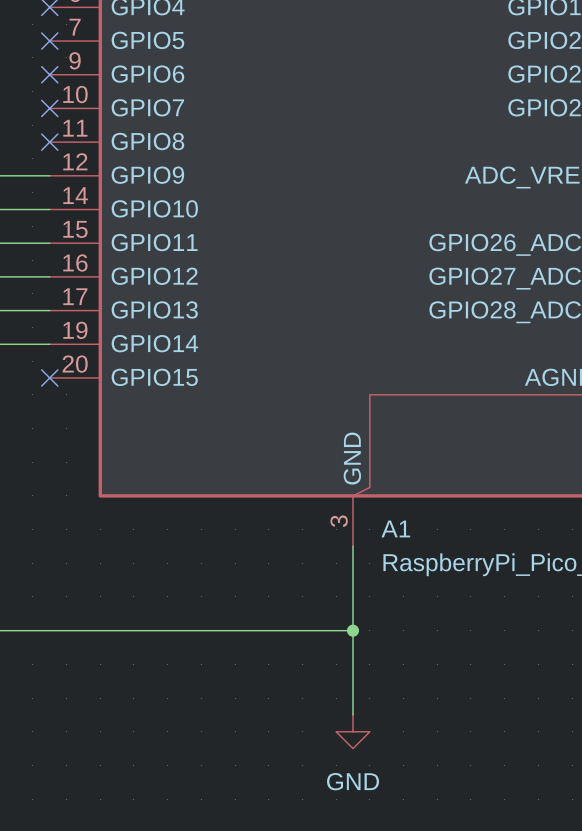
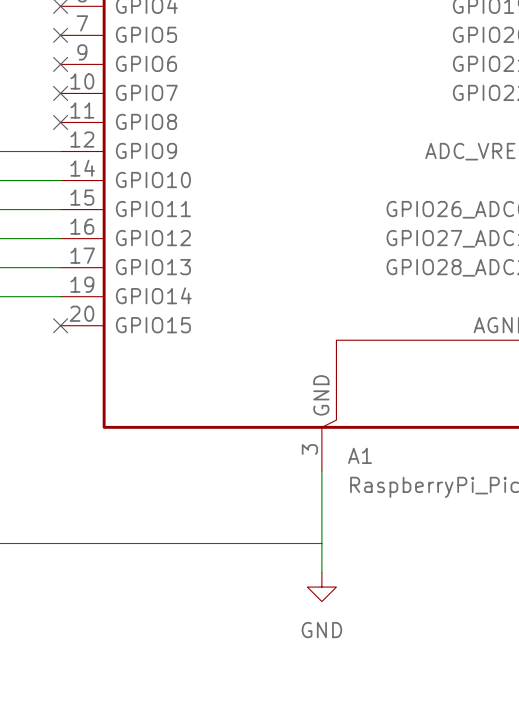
junction: (353, 630) -> none
wire: (353, 664) (353, 714) -> none
power symbol position: GND (353, 731) -> GND (321, 587)

